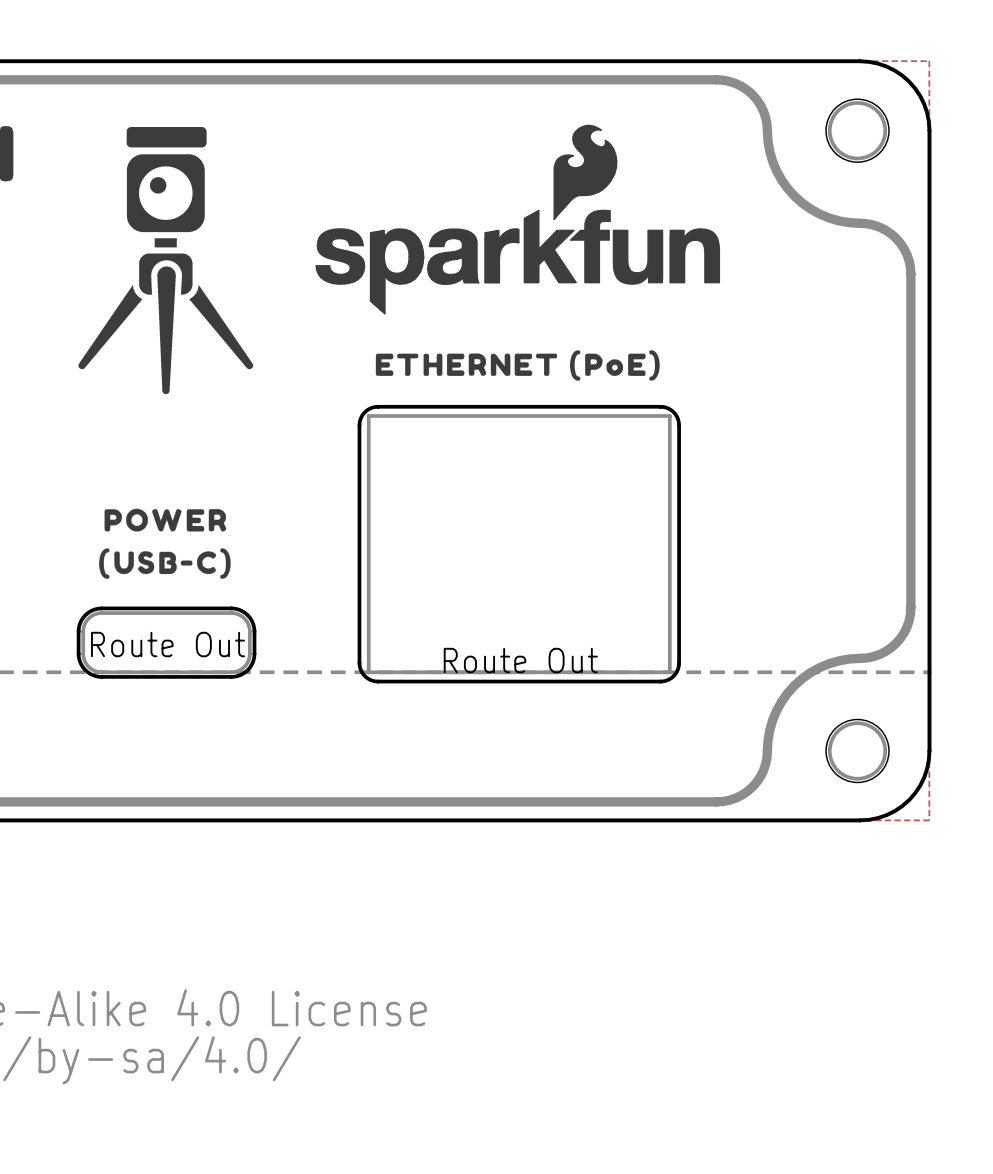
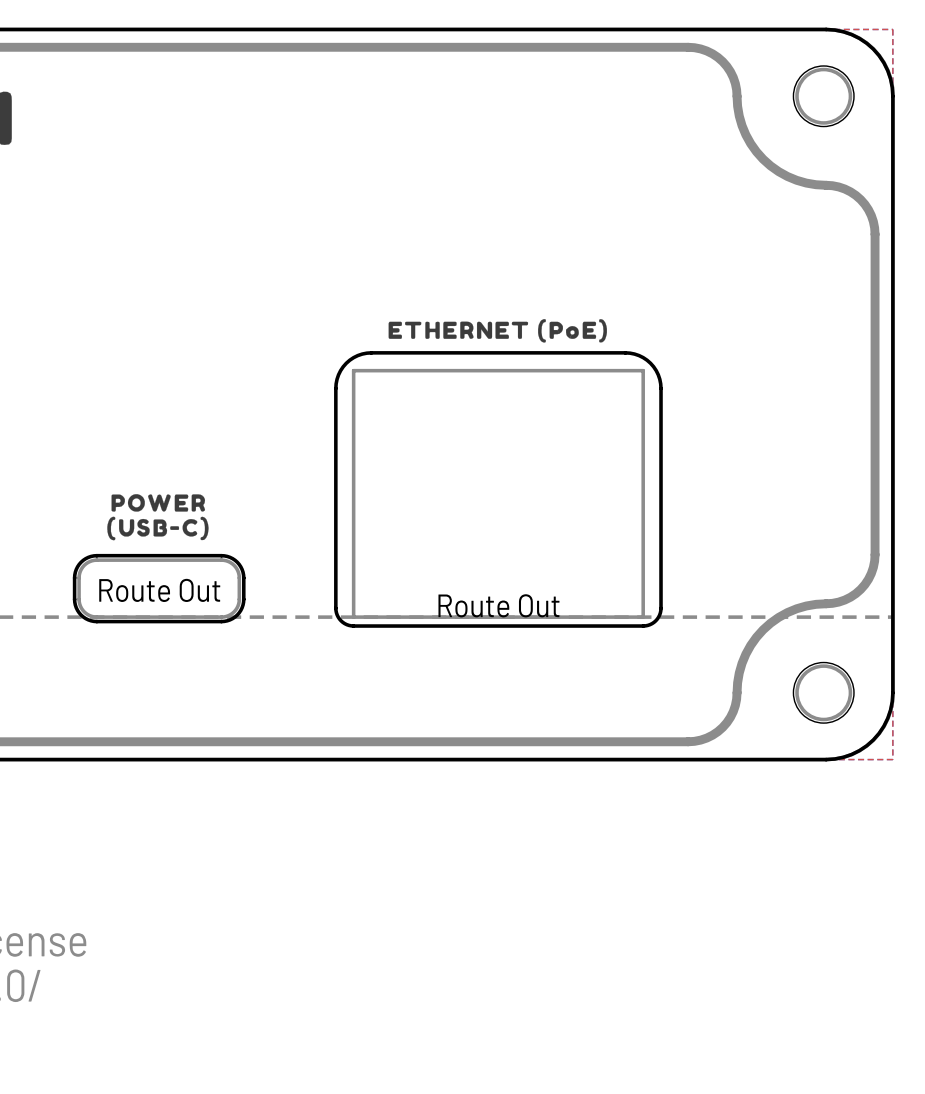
drawing: [315, 124, 721, 315] -> none
drawing: [78, 126, 254, 395] -> none
drawing shape: [375, 350, 660, 381] -> [388, 319, 607, 343]
drawing shape: [357, 404, 681, 684] -> [334, 351, 663, 628]
drawing: [99, 508, 231, 579] -> none
drawing: none -> [107, 494, 209, 541]

